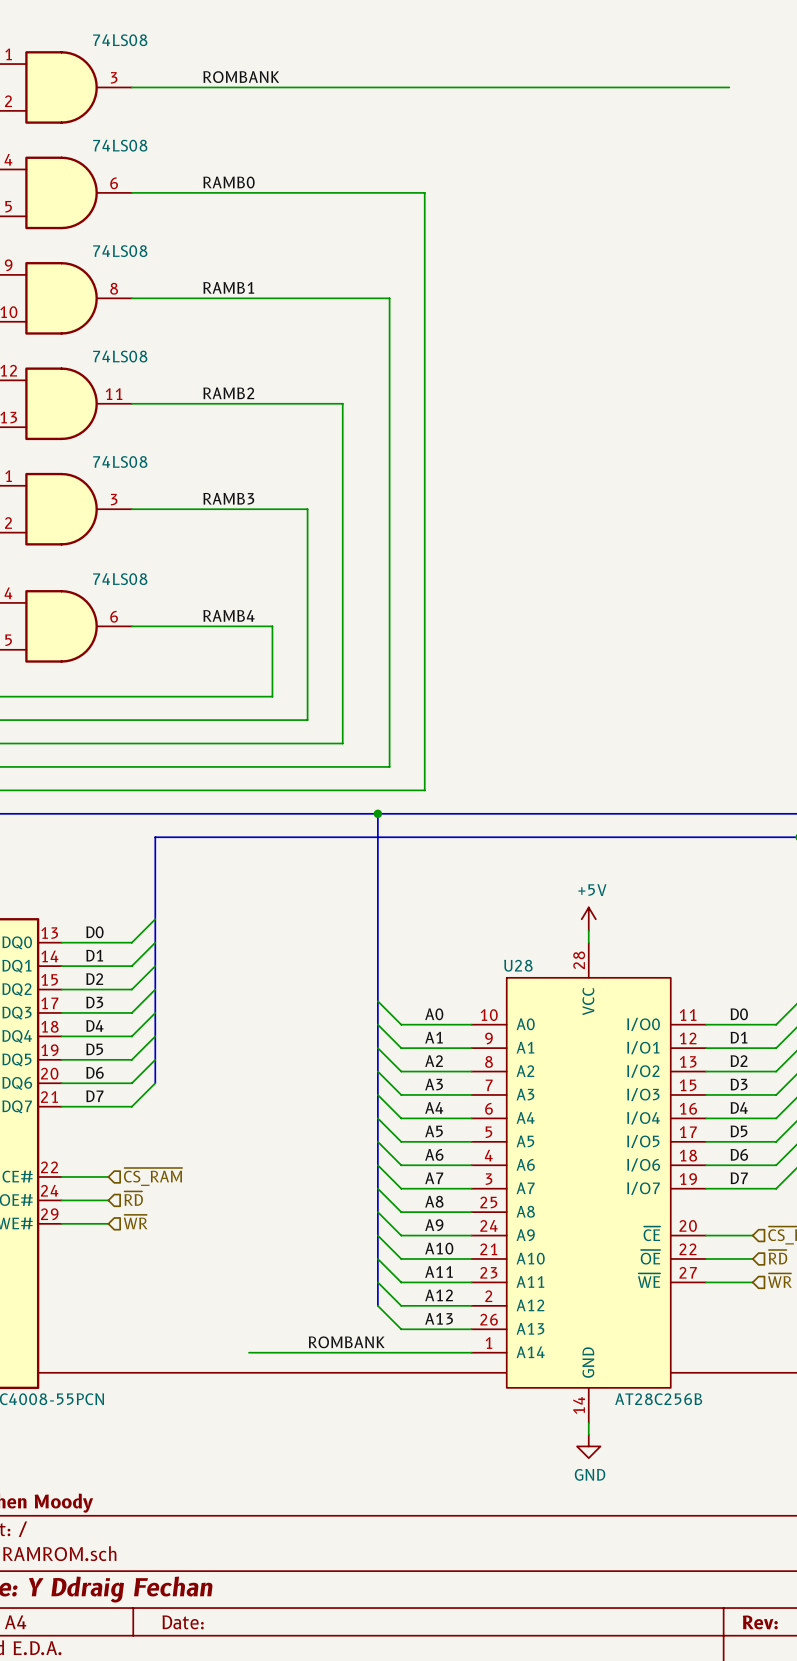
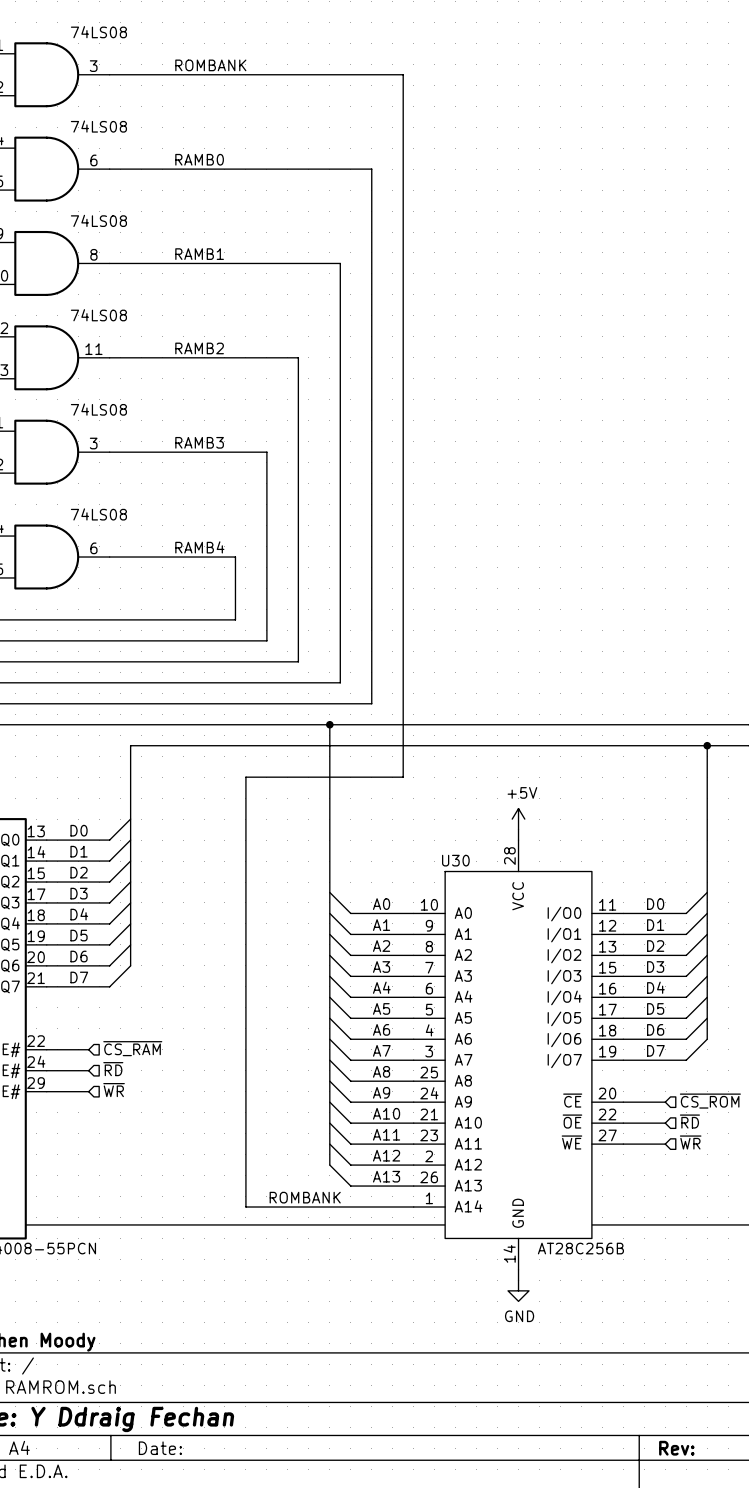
wire: (459, 87) (729, 87) -> none
U28 name: U28 (518, 965) -> U30 (455, 860)
wire: (249, 1352) (284, 1352) -> (403, 74) (403, 777) (245, 777) (245, 1207)

